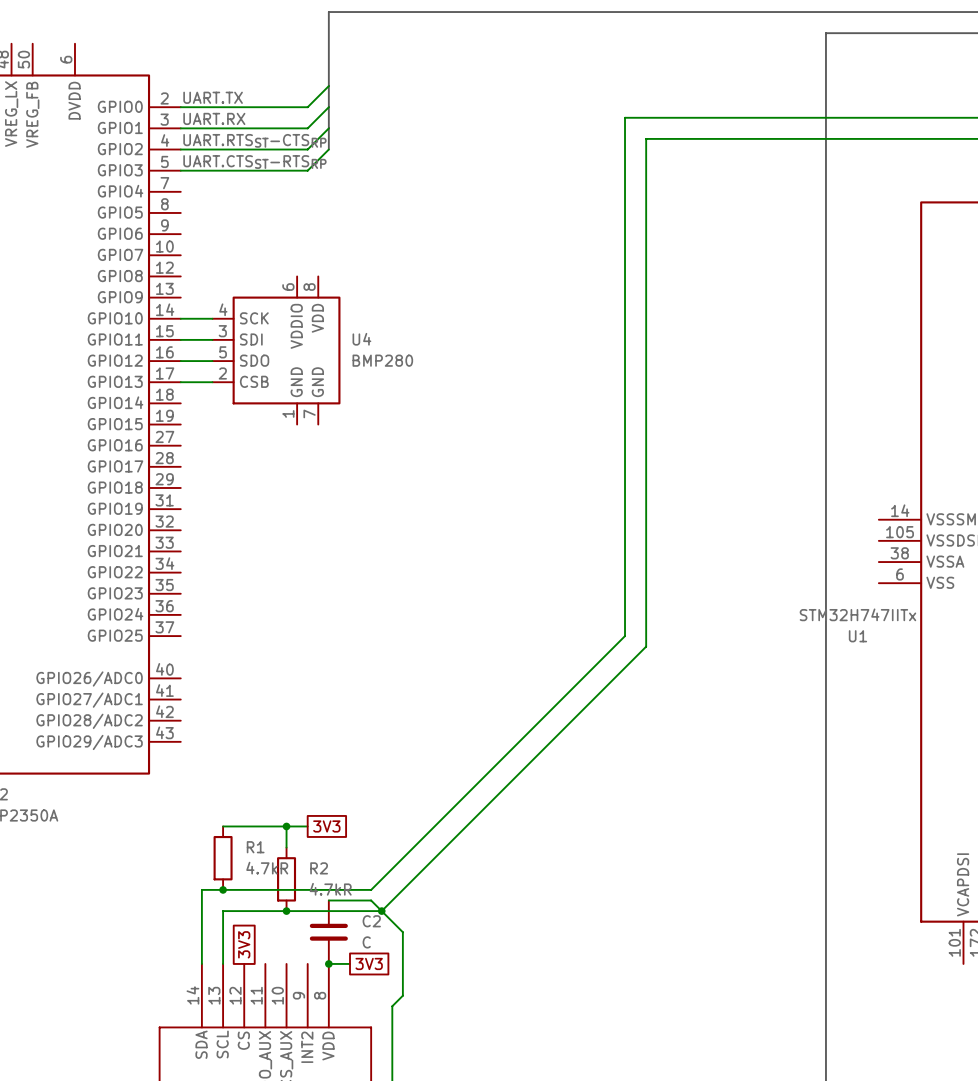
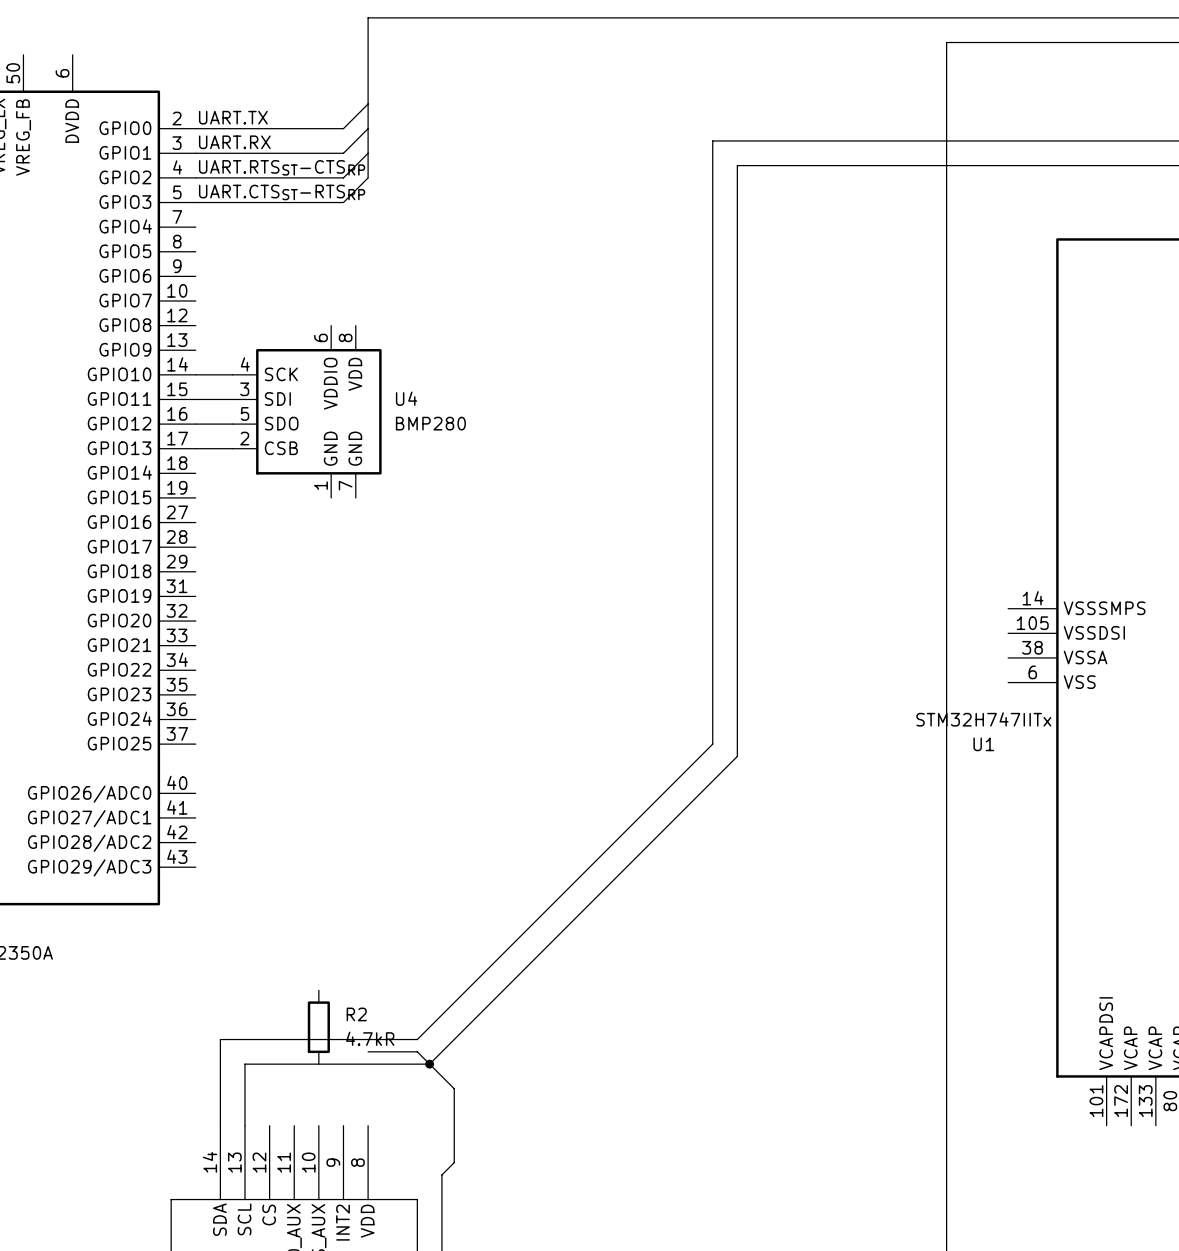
wire: (223, 826) (307, 826) -> none
wire: (286, 826) (286, 847) -> none
junction: (286, 826) -> none
global label: 3V3 (326, 826) -> none
R1: 4.7kR (223, 858) -> none
junction: (223, 889) -> none
junction: (286, 911) -> none
C2: C (328, 932) -> none
global label: 3V3 (244, 944) -> none
wire: (328, 963) (350, 963) -> none
junction: (328, 963) -> none
global label: 3V3 (369, 963) -> none

